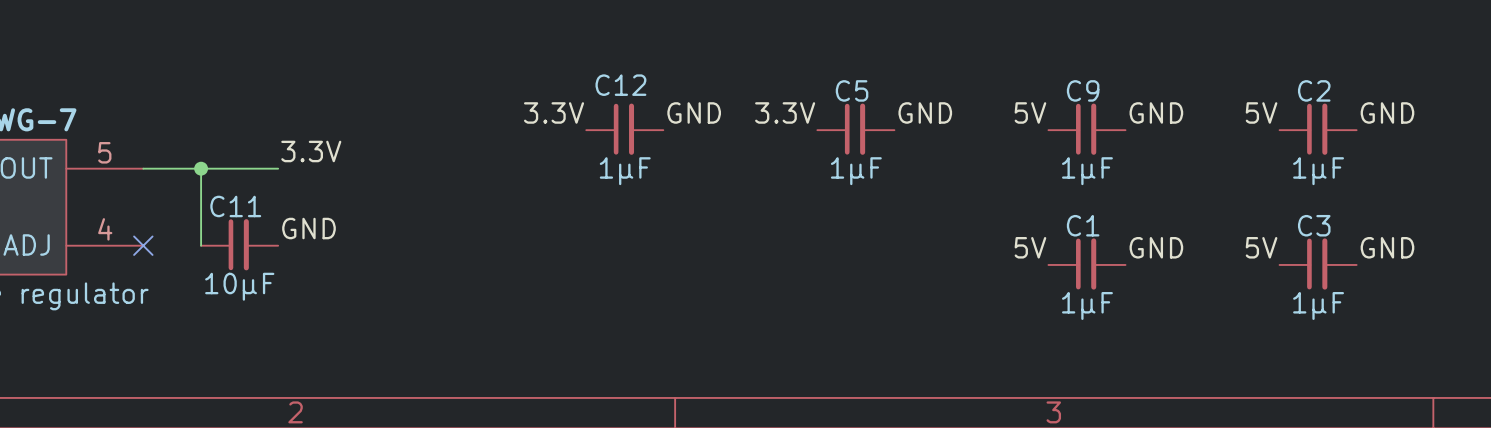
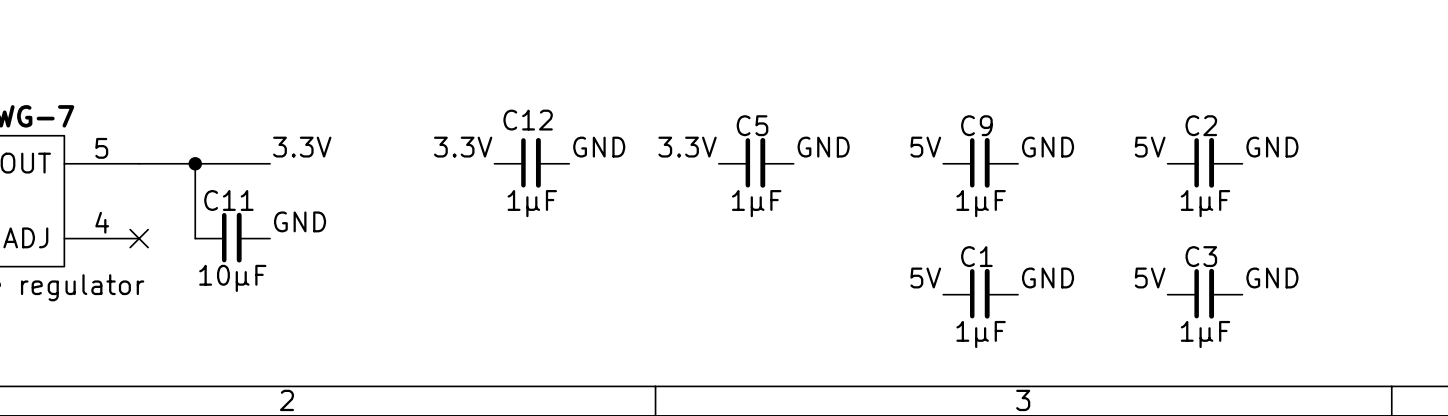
label position: 3.3V (554, 112) -> 3.3V (463, 147)
label: GND (694, 112) -> none
label position: 3.3V (785, 112) -> 3.3V (687, 147)
label: GND (925, 112) -> none
label: 5V (1030, 112) -> none
label: GND (1156, 112) -> none
label: 5V (1261, 112) -> none
label: GND (1387, 112) -> none
C12 position: (624, 129) -> (531, 162)
C5 position: (855, 129) -> (756, 162)
C9 position: (1086, 129) -> (980, 162)
C2 position: (1318, 129) -> (1205, 162)
label: none -> GND (599, 147)
label: none -> GND (823, 147)
label: none -> 5V (925, 147)
label: none -> GND (1048, 147)
label: none -> 5V (1150, 147)
label: none -> GND (1272, 147)
label: 5V (1030, 247) -> none
label: GND (1156, 247) -> none
label: 5V (1261, 247) -> none
label: GND (1387, 247) -> none
C1 position: (1086, 264) -> (980, 293)
C3 position: (1318, 264) -> (1205, 293)
label: none -> 5V (925, 277)
label: none -> GND (1048, 277)
label: none -> 5V (1150, 277)
label: none -> GND (1272, 277)

